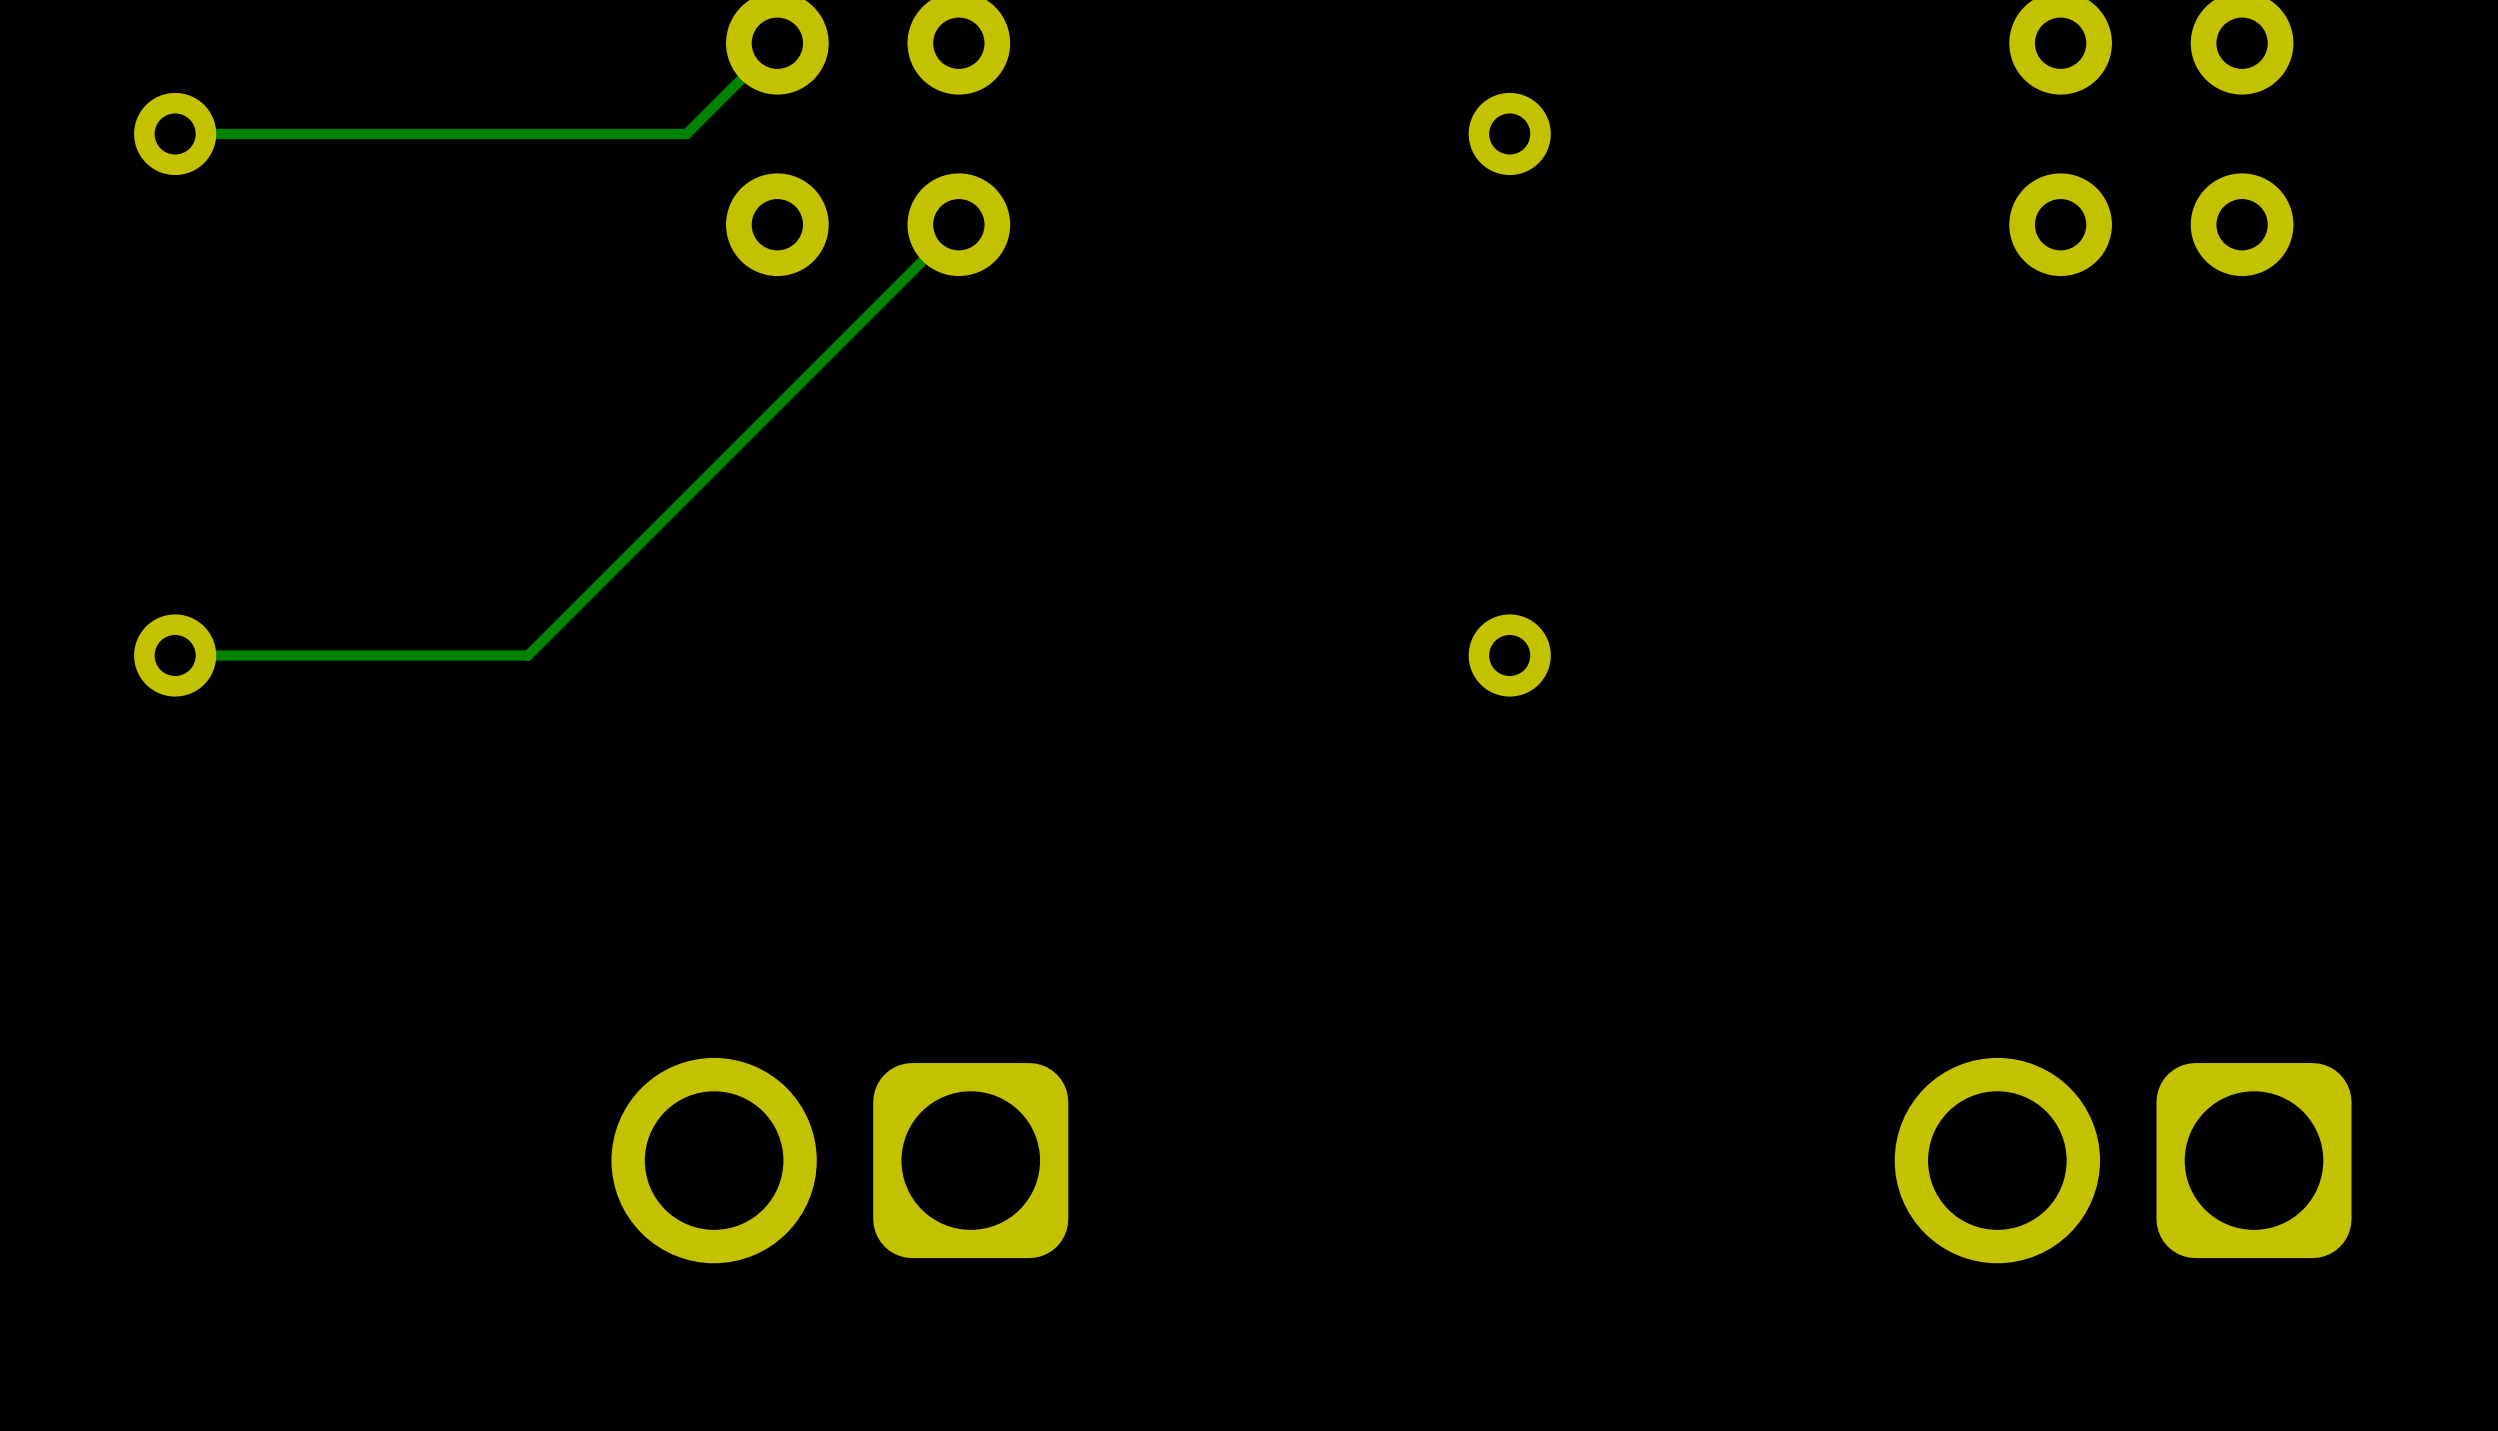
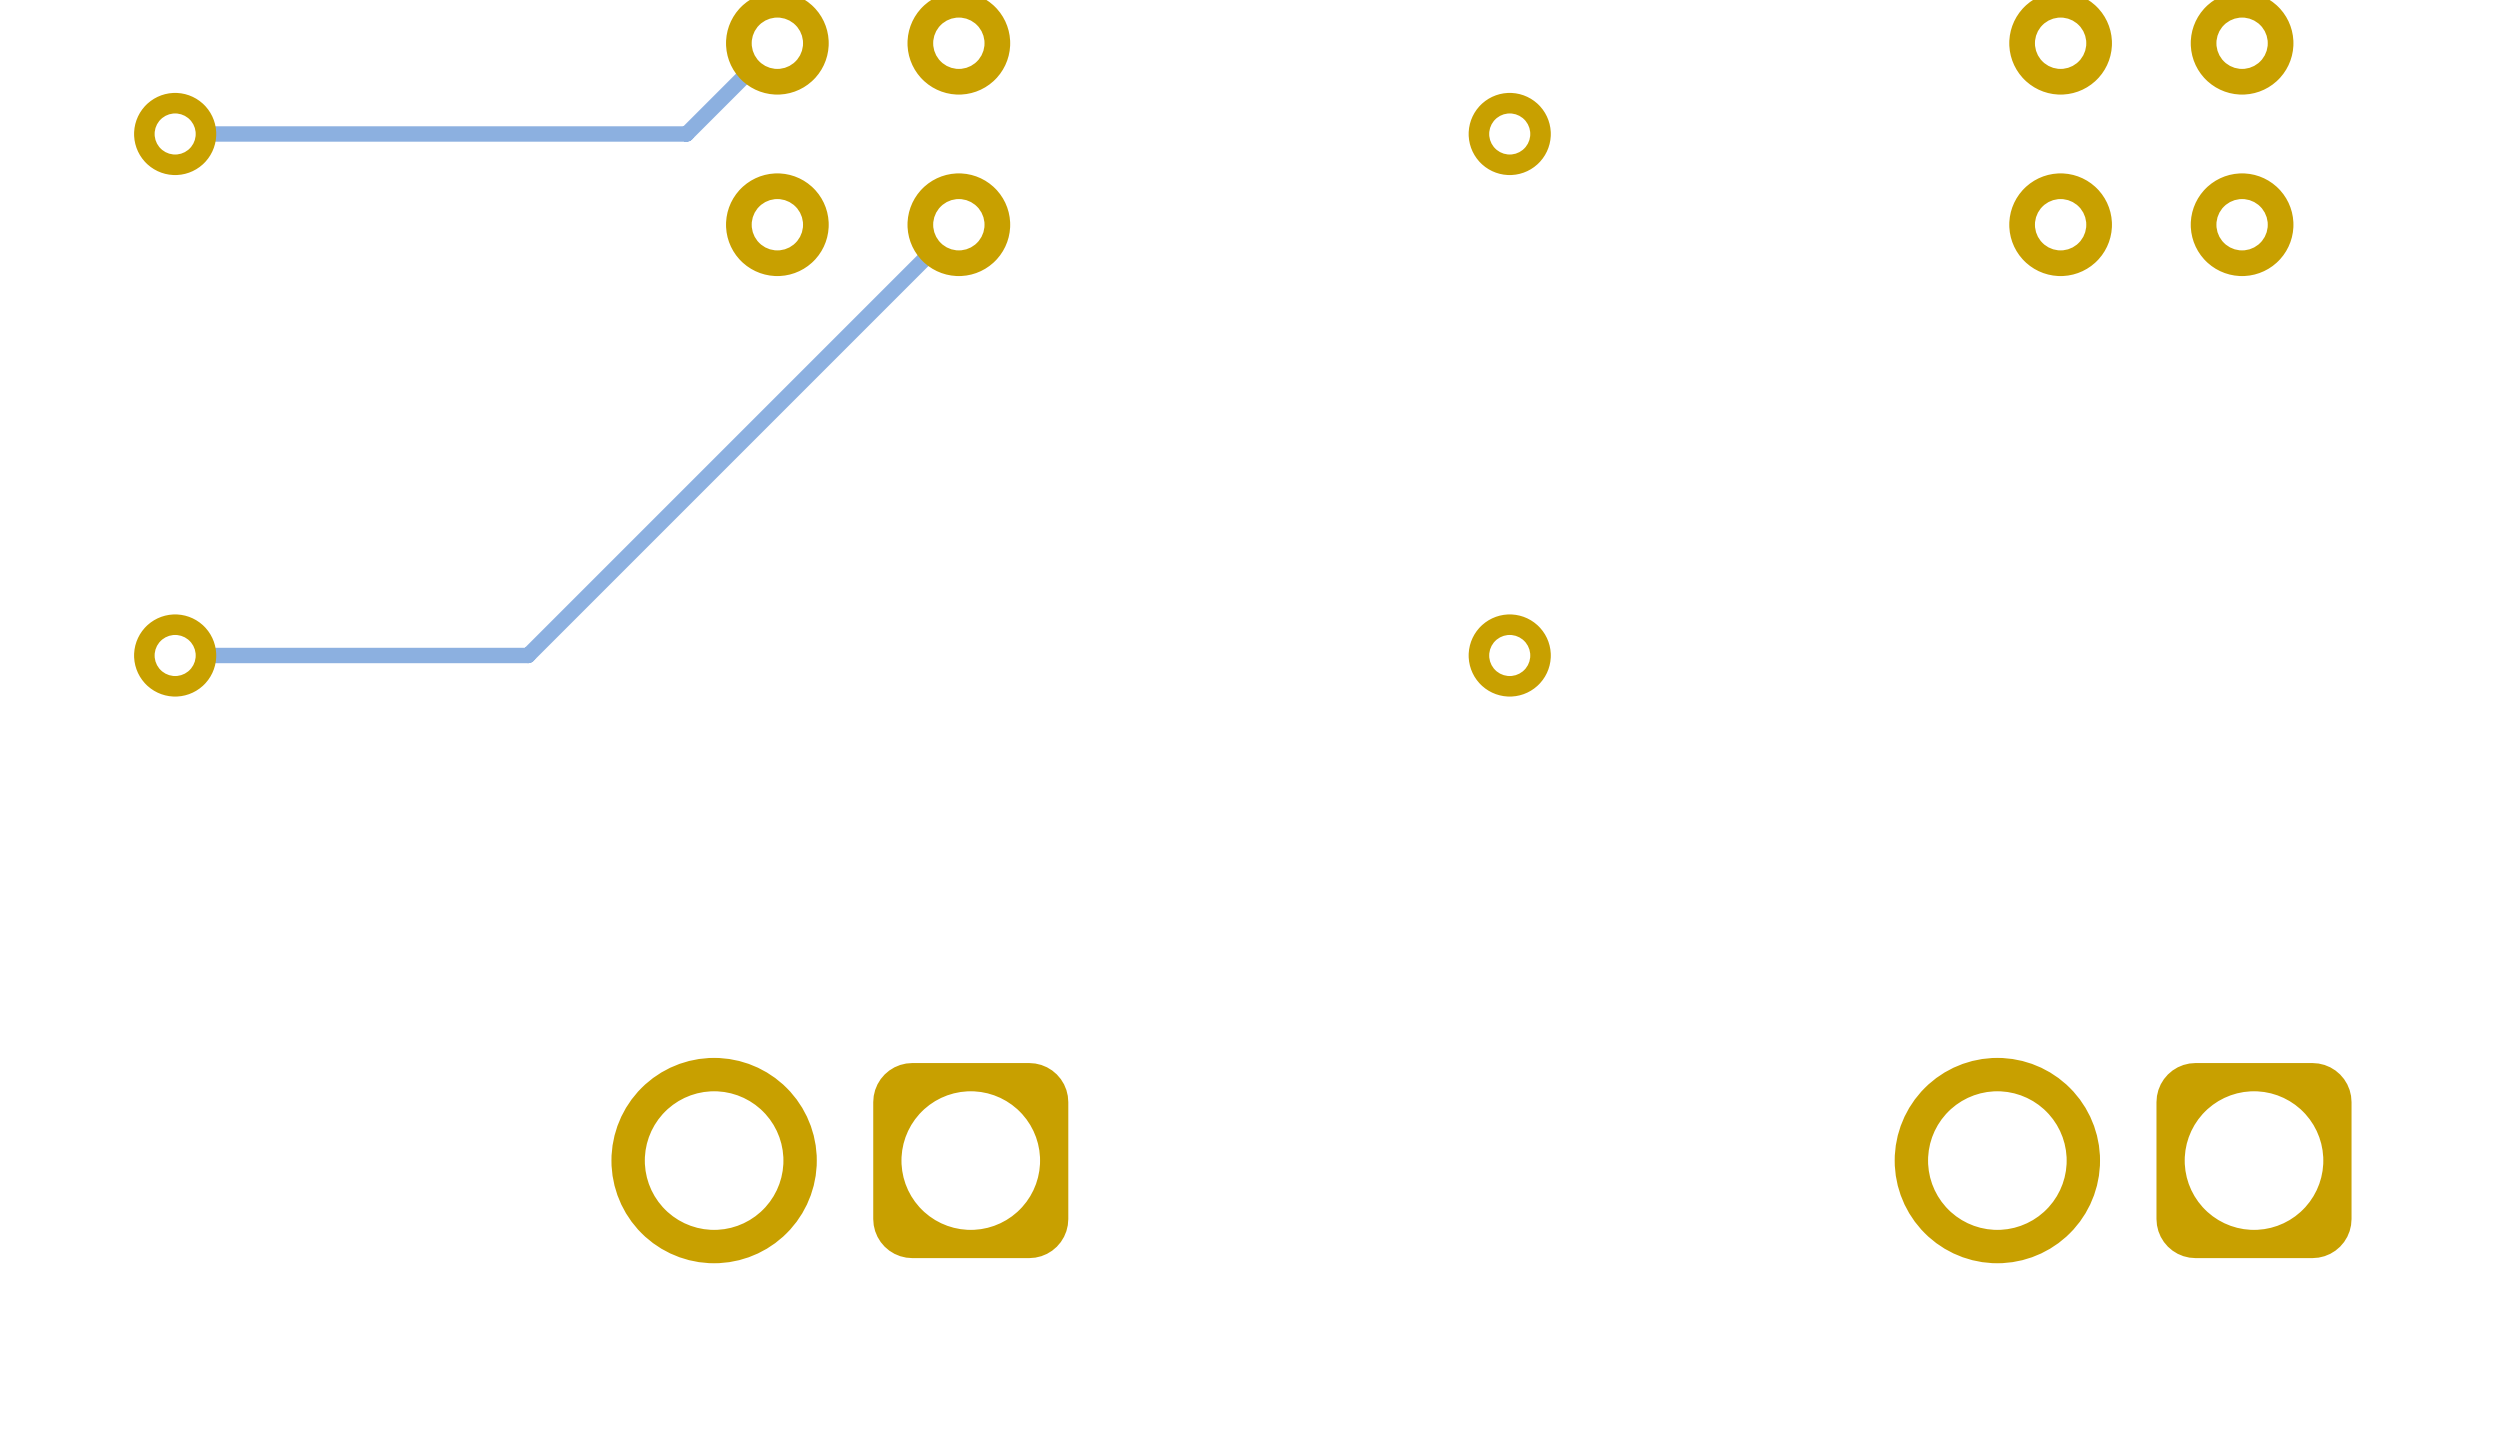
track width: thin (777, 43) (686, 133) (175, 133) -> thick (777, 43) (686, 133) (175, 133)
track width: thin (958, 224) (528, 655) (175, 655) -> thick (958, 224) (528, 655) (175, 655)

